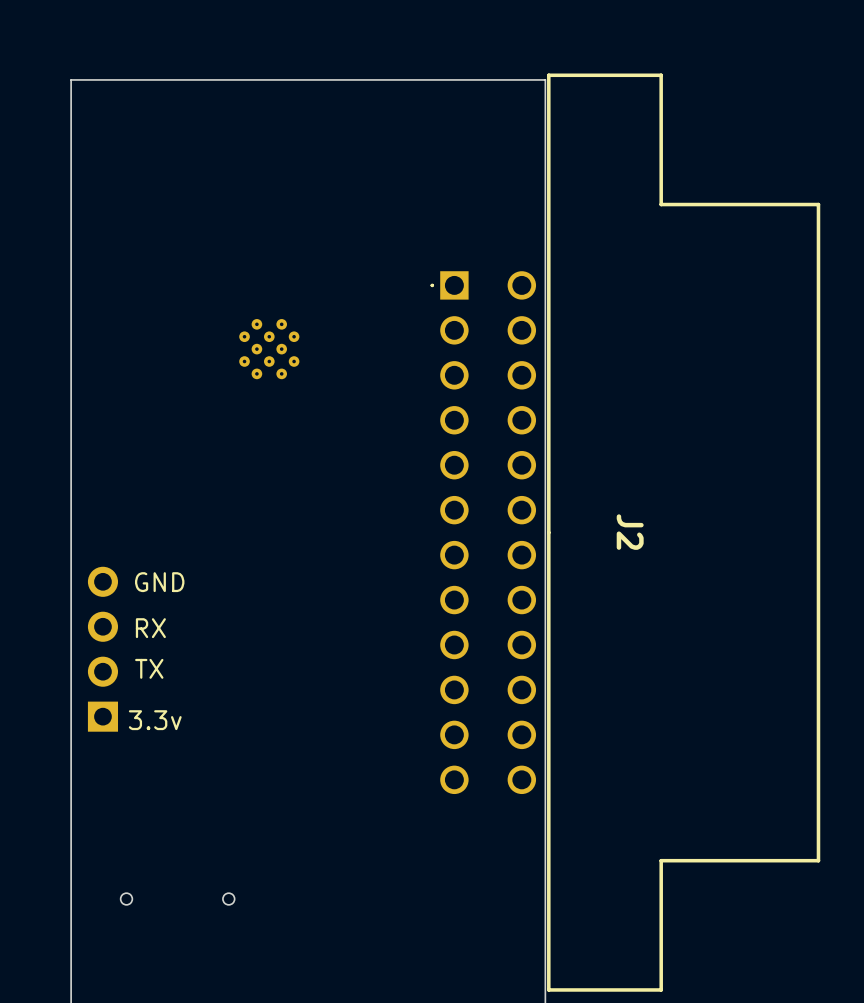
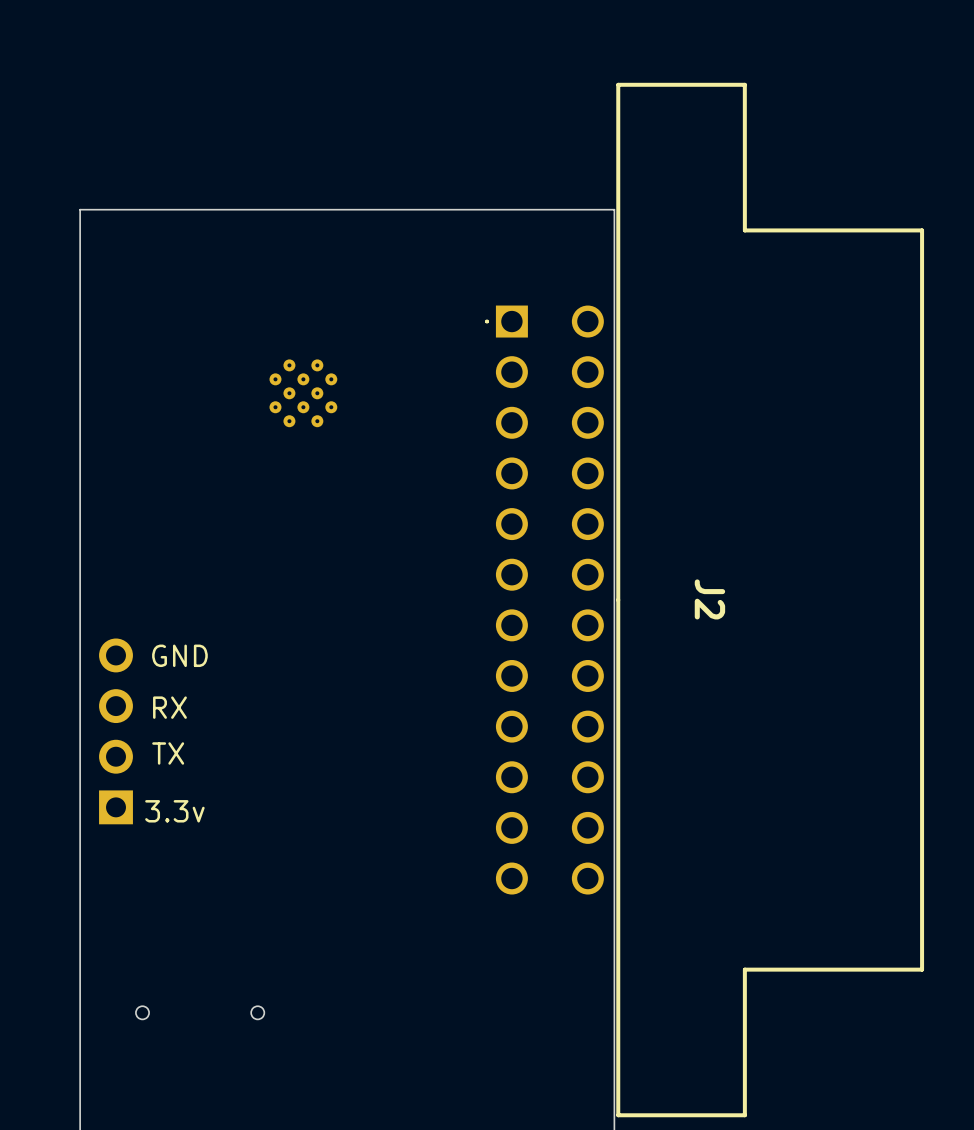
board edge: (545, 186) (545, 79) (71, 79) (71, 186) -> (614, 209) (80, 209)

